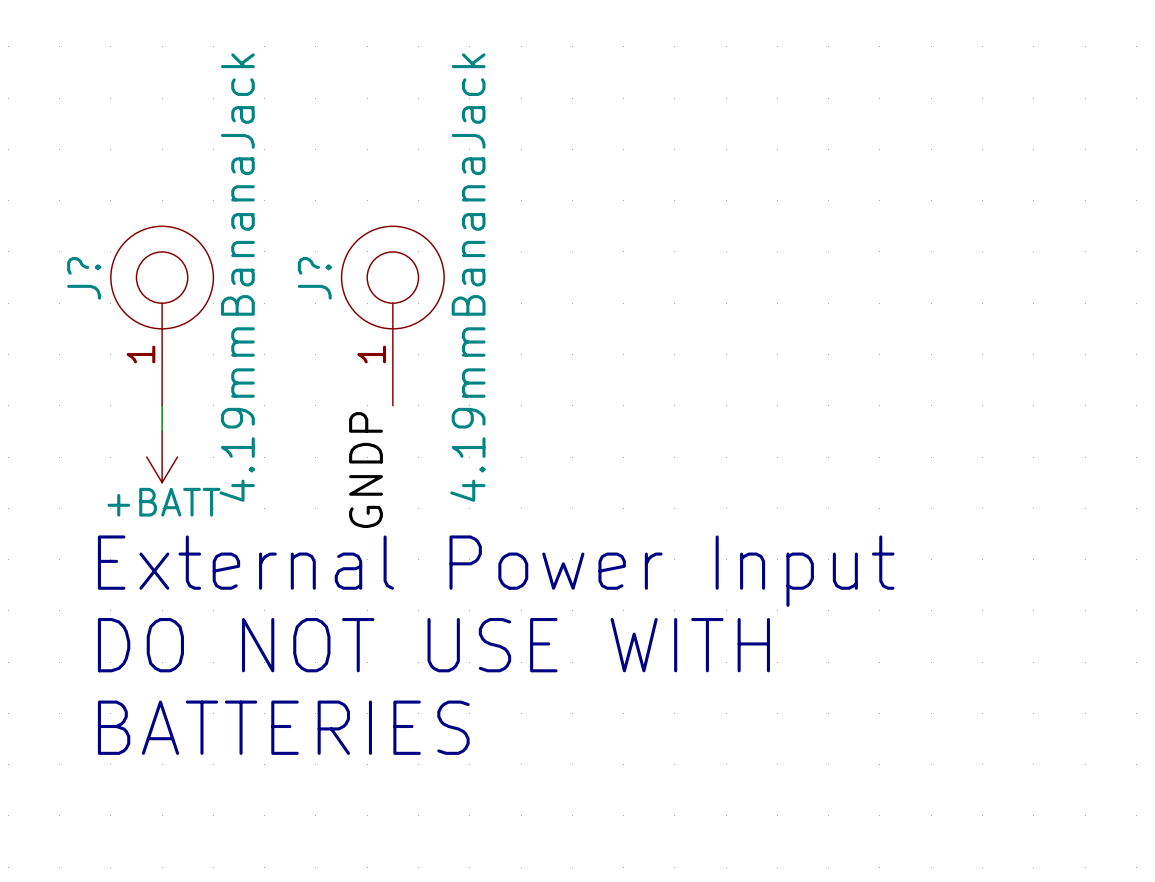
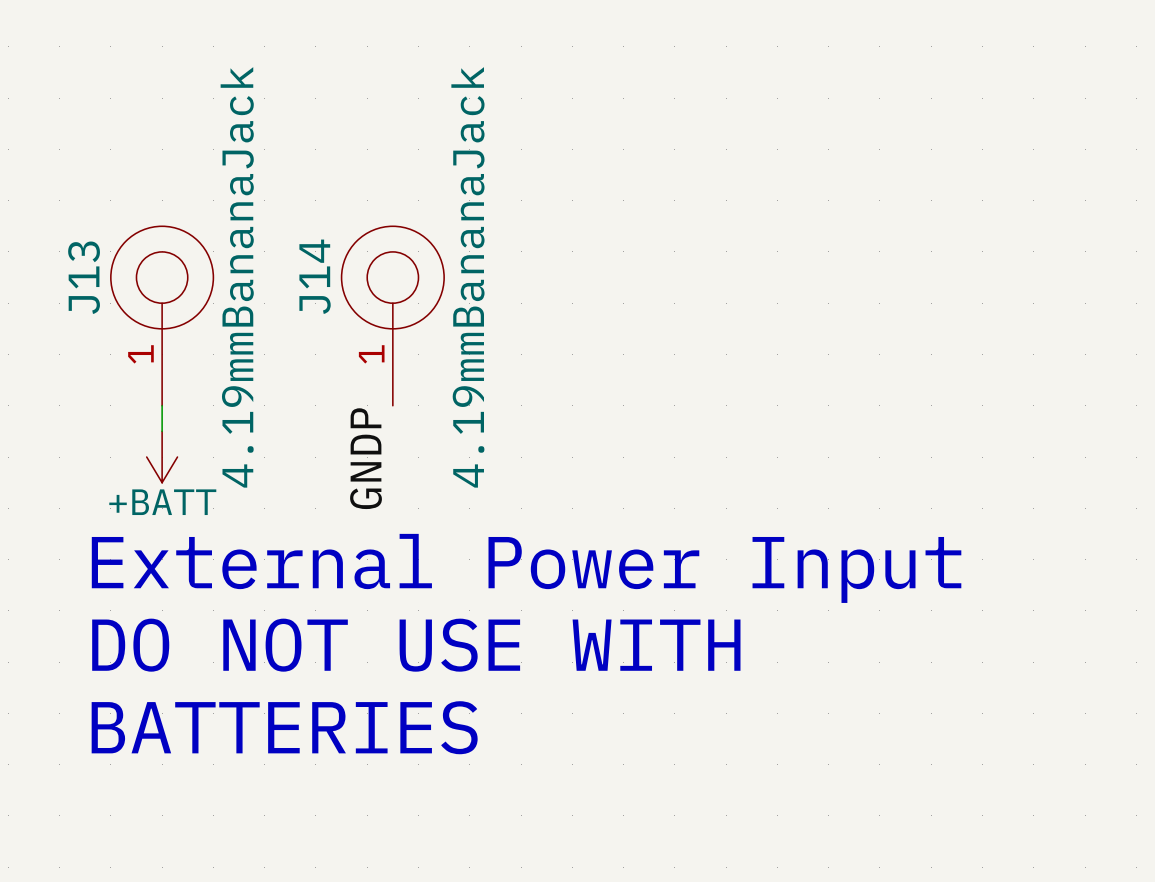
J? name: J? (84, 278) -> J13 (84, 277)
J? name: J? (314, 278) -> J14 (315, 276)

